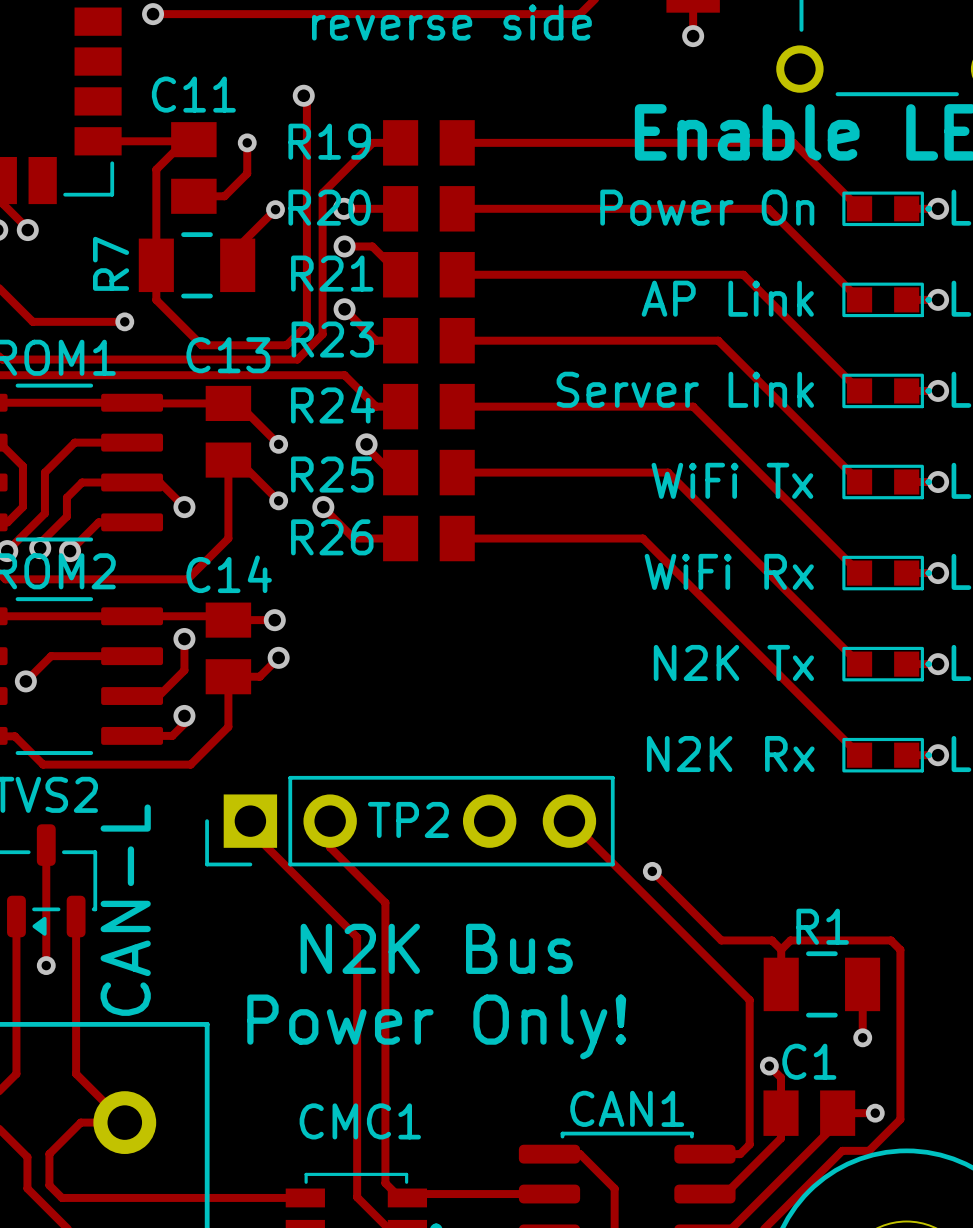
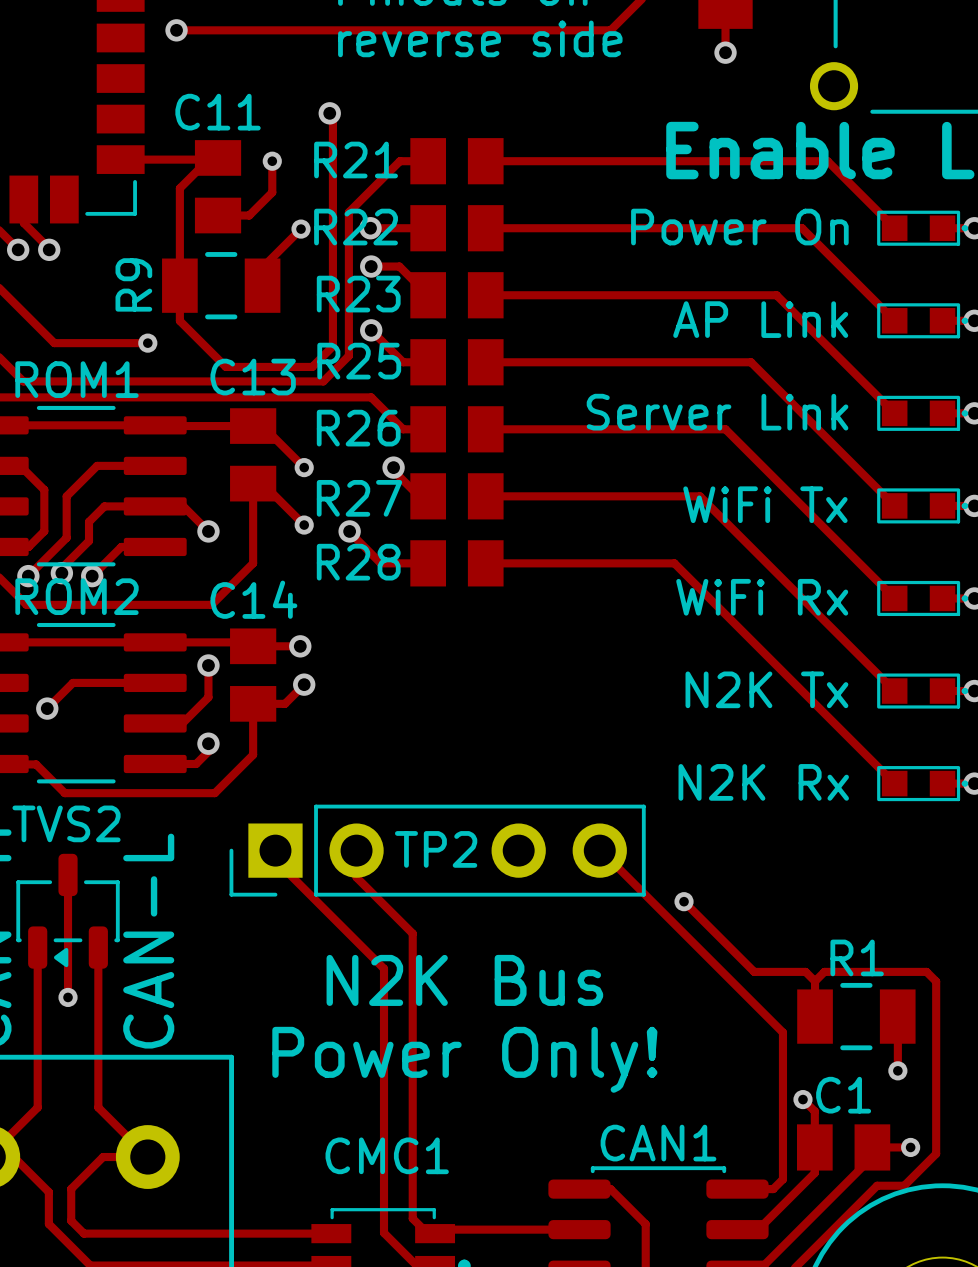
R19 name: R19 (329, 141) -> R21 (356, 160)
R20 name: R20 (329, 207) -> R22 (356, 227)
R7 name: R7 (111, 263) -> R9 (133, 284)
R21 name: R21 (332, 273) -> R23 (358, 294)
R23 name: R23 (332, 339) -> R25 (359, 361)
R24 name: R24 (333, 404) -> R26 (358, 428)
R25 name: R25 (332, 474) -> R27 (359, 498)
R26 name: R26 (332, 537) -> R28 (358, 562)

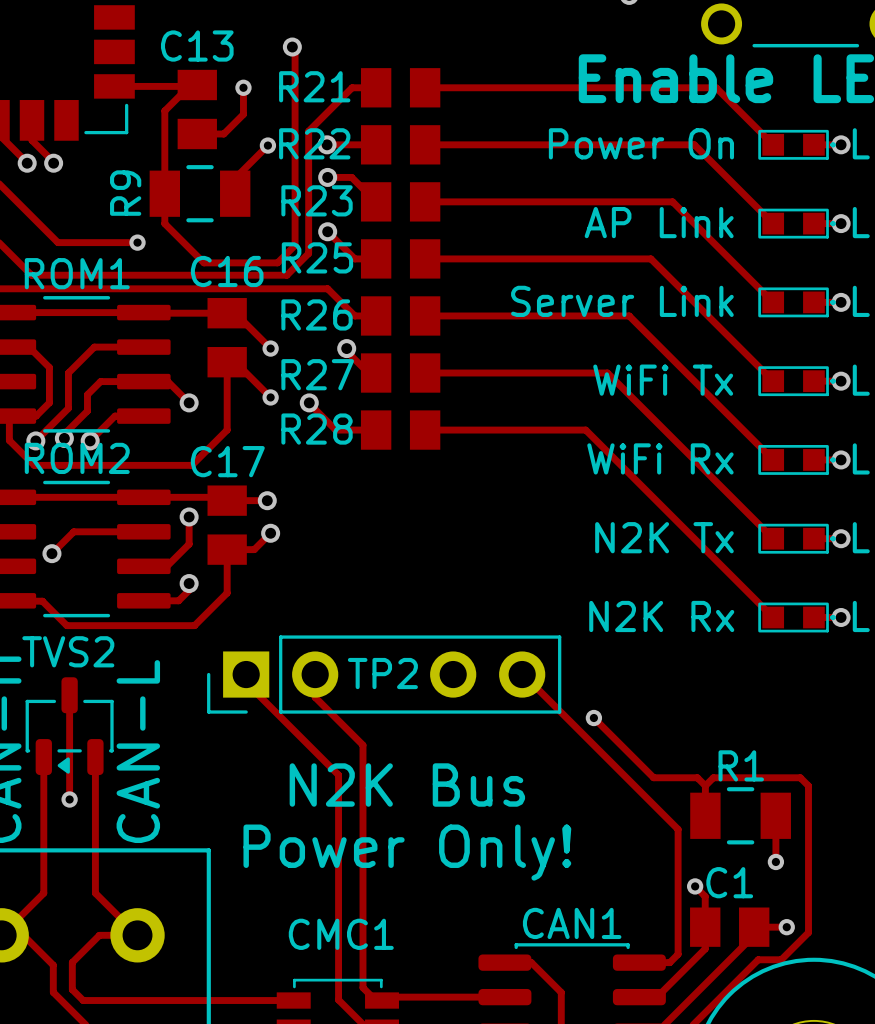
C11 name: C11 (218, 112) -> C13 (197, 46)
C13 name: C13 (253, 377) -> C16 (227, 271)
C14 name: C14 (253, 599) -> C17 (227, 461)

